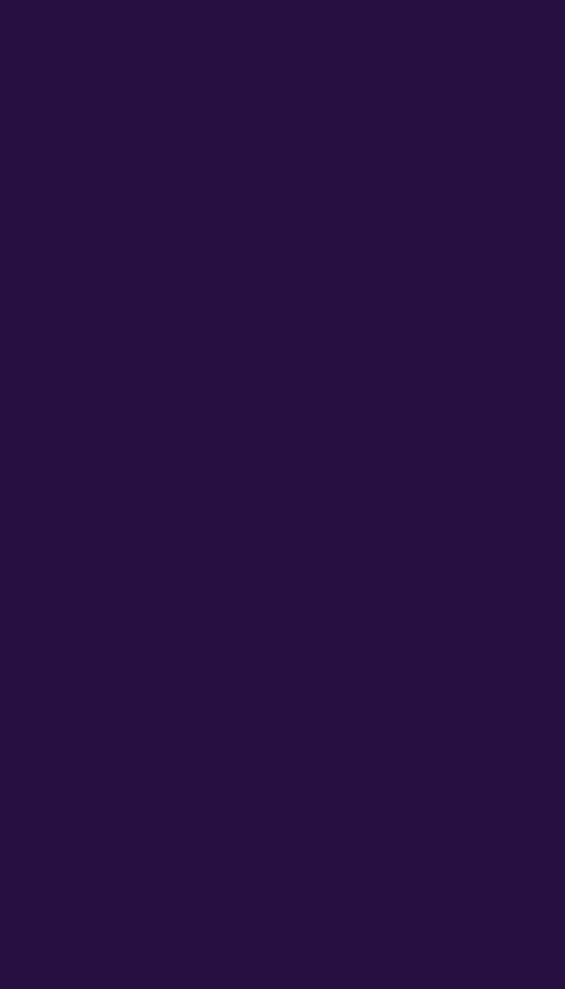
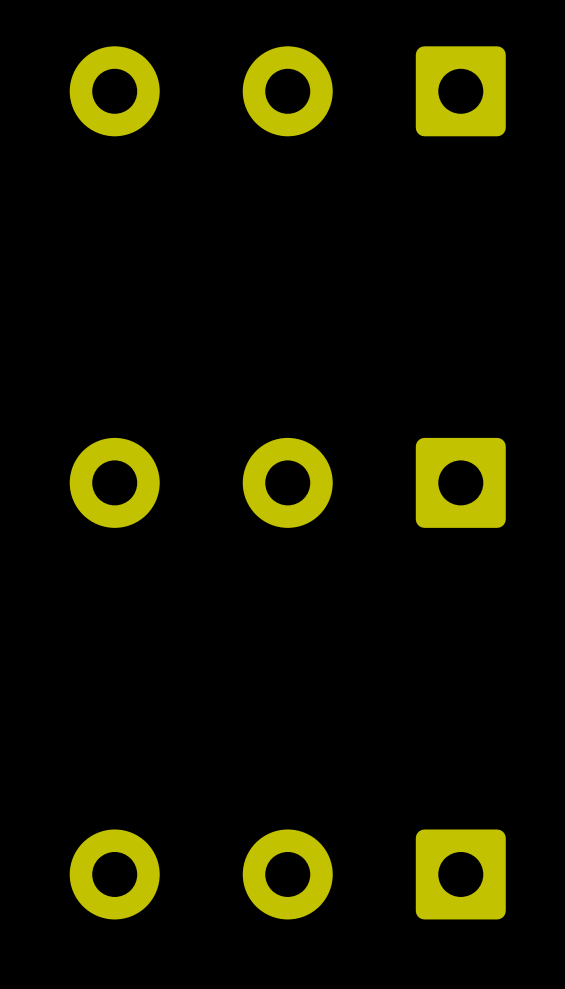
part: none -> (287, 91)
part: none -> (287, 482)
part: none -> (287, 874)

